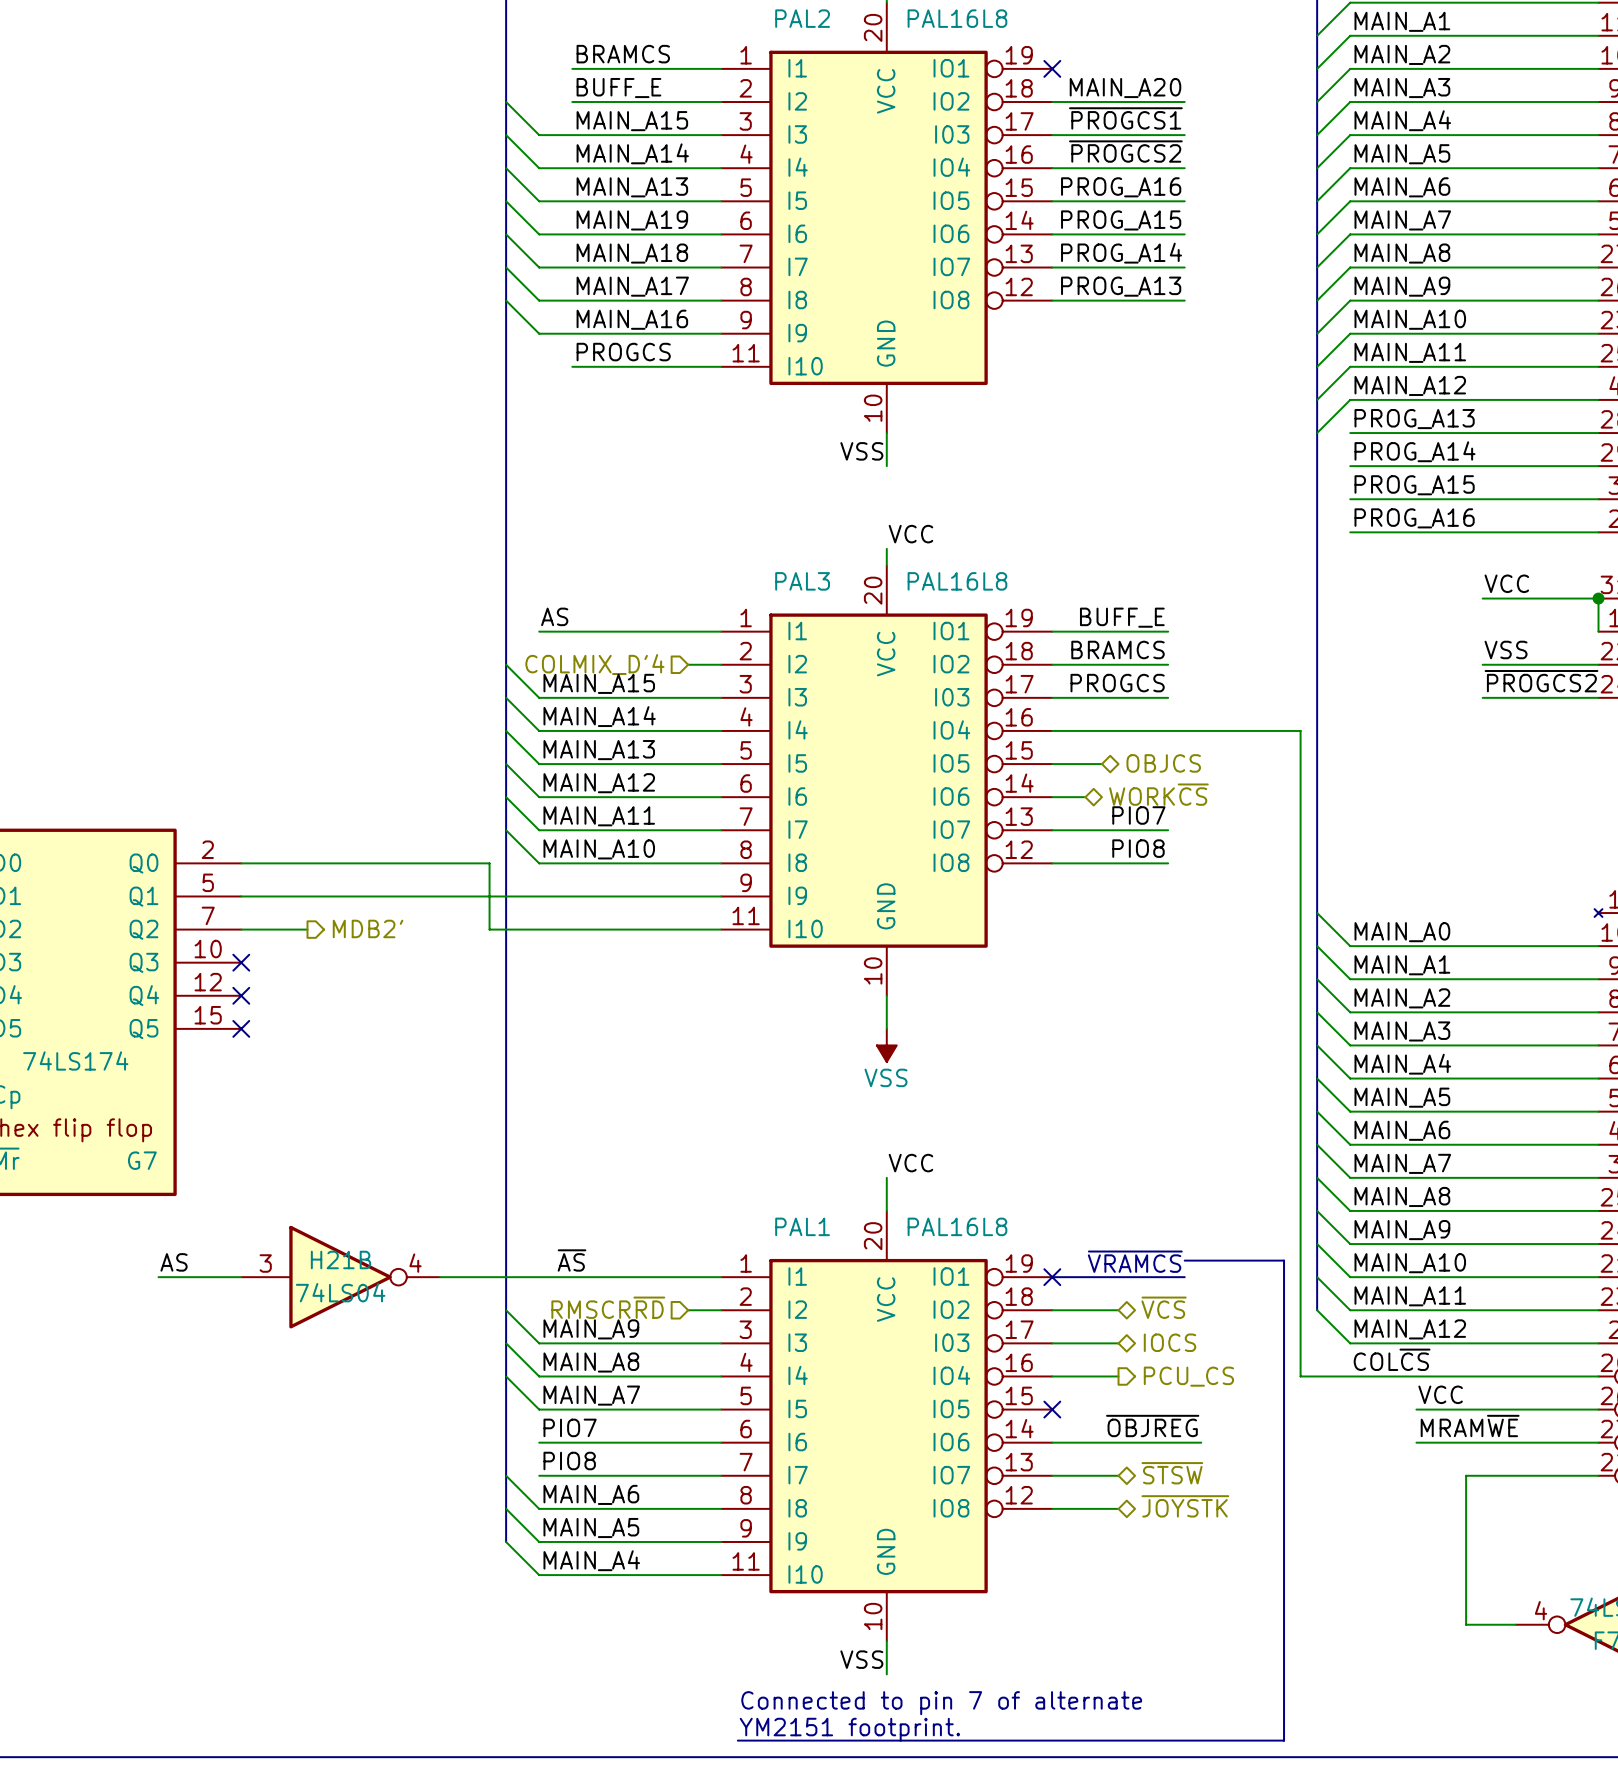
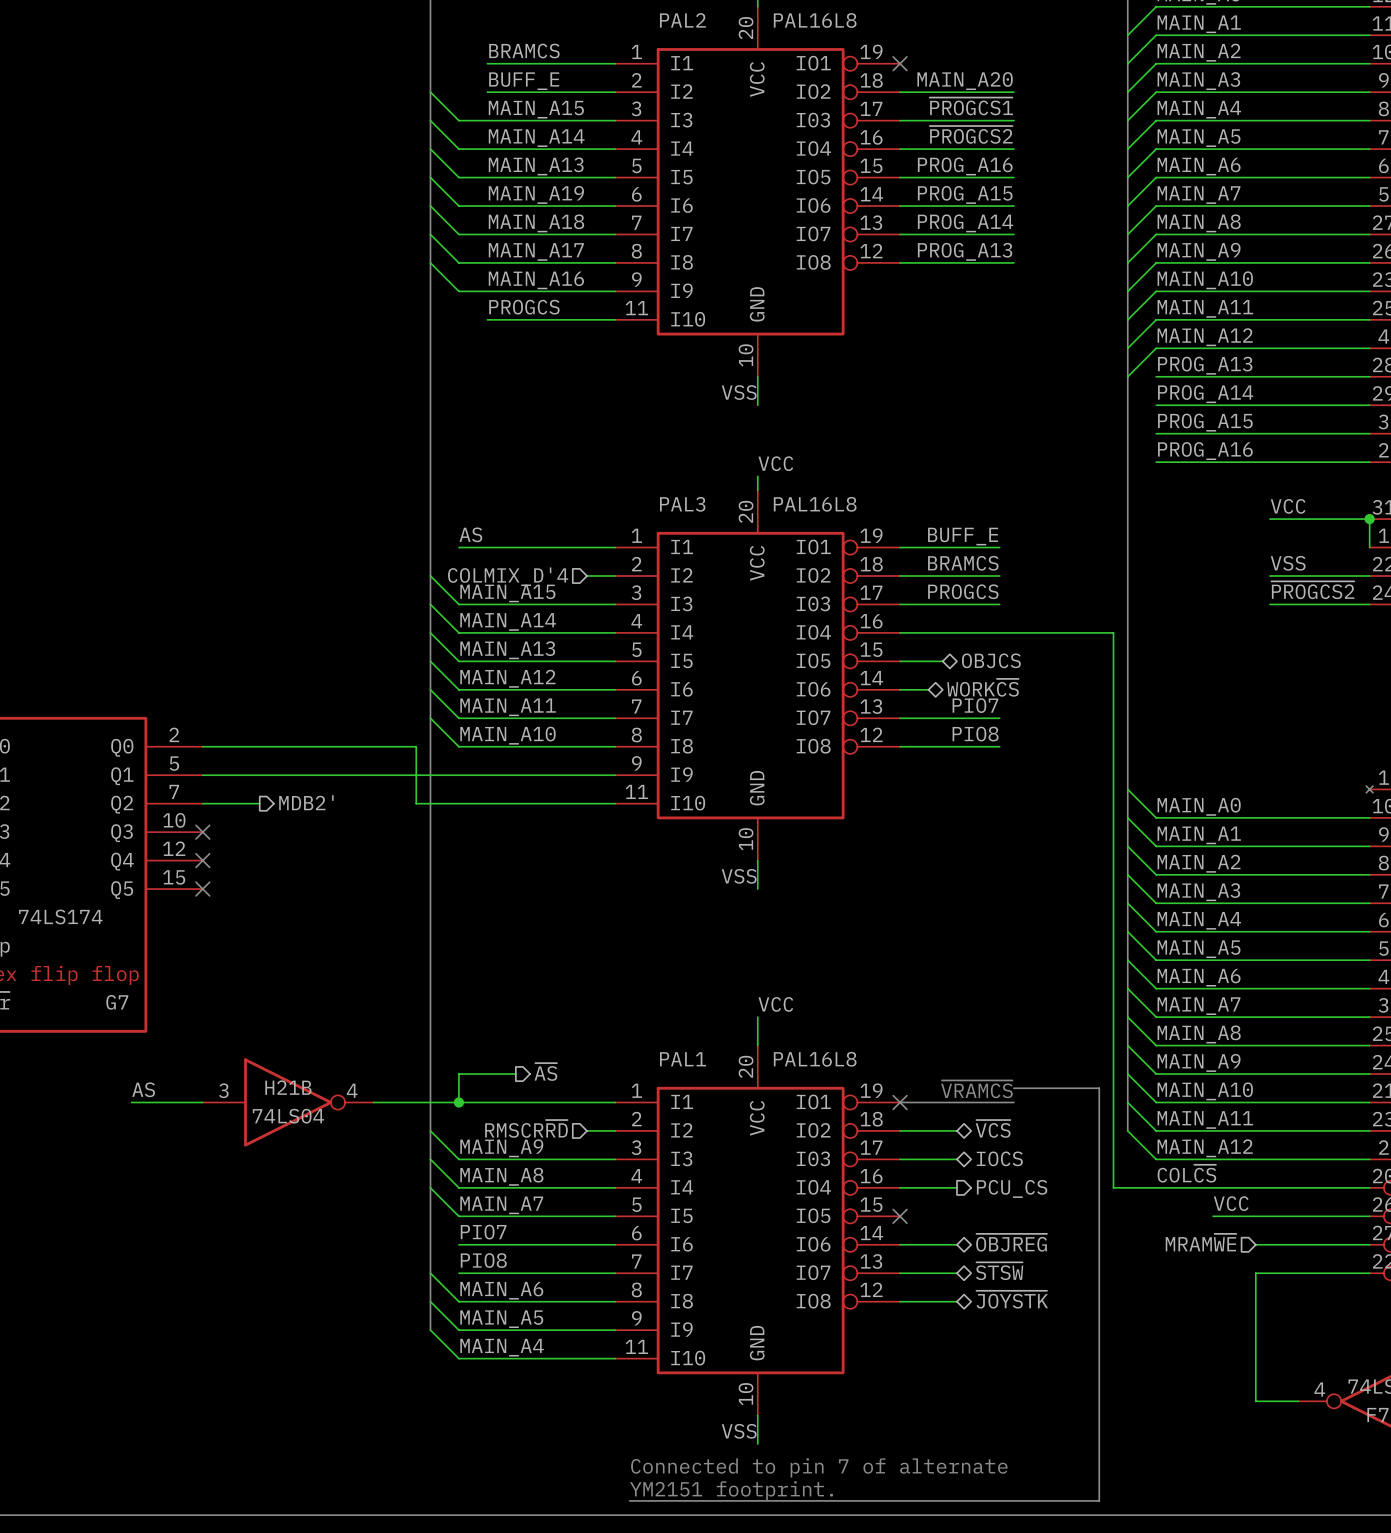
label: none -> VSS (739, 876)
power symbol: VSS (886, 1045) -> none
hierarchical label: none -> ~{AS} (545, 1071)
wire: none -> (515, 1074) (458, 1074) (458, 1102)
label: ~{AS} (572, 1260) -> none
junction: none -> (458, 1102)
label: ~{OBJREG} (1152, 1426) -> none
label: MRAM~{WE} (1470, 1426) -> none
hierarchical label: none -> ~{OBJREG} (1011, 1242)
hierarchical label: none -> MRAM~{WE} (1201, 1242)
wire: (1118, 1442) (1201, 1442) -> none
wire: (1416, 1442) (1466, 1442) -> none

